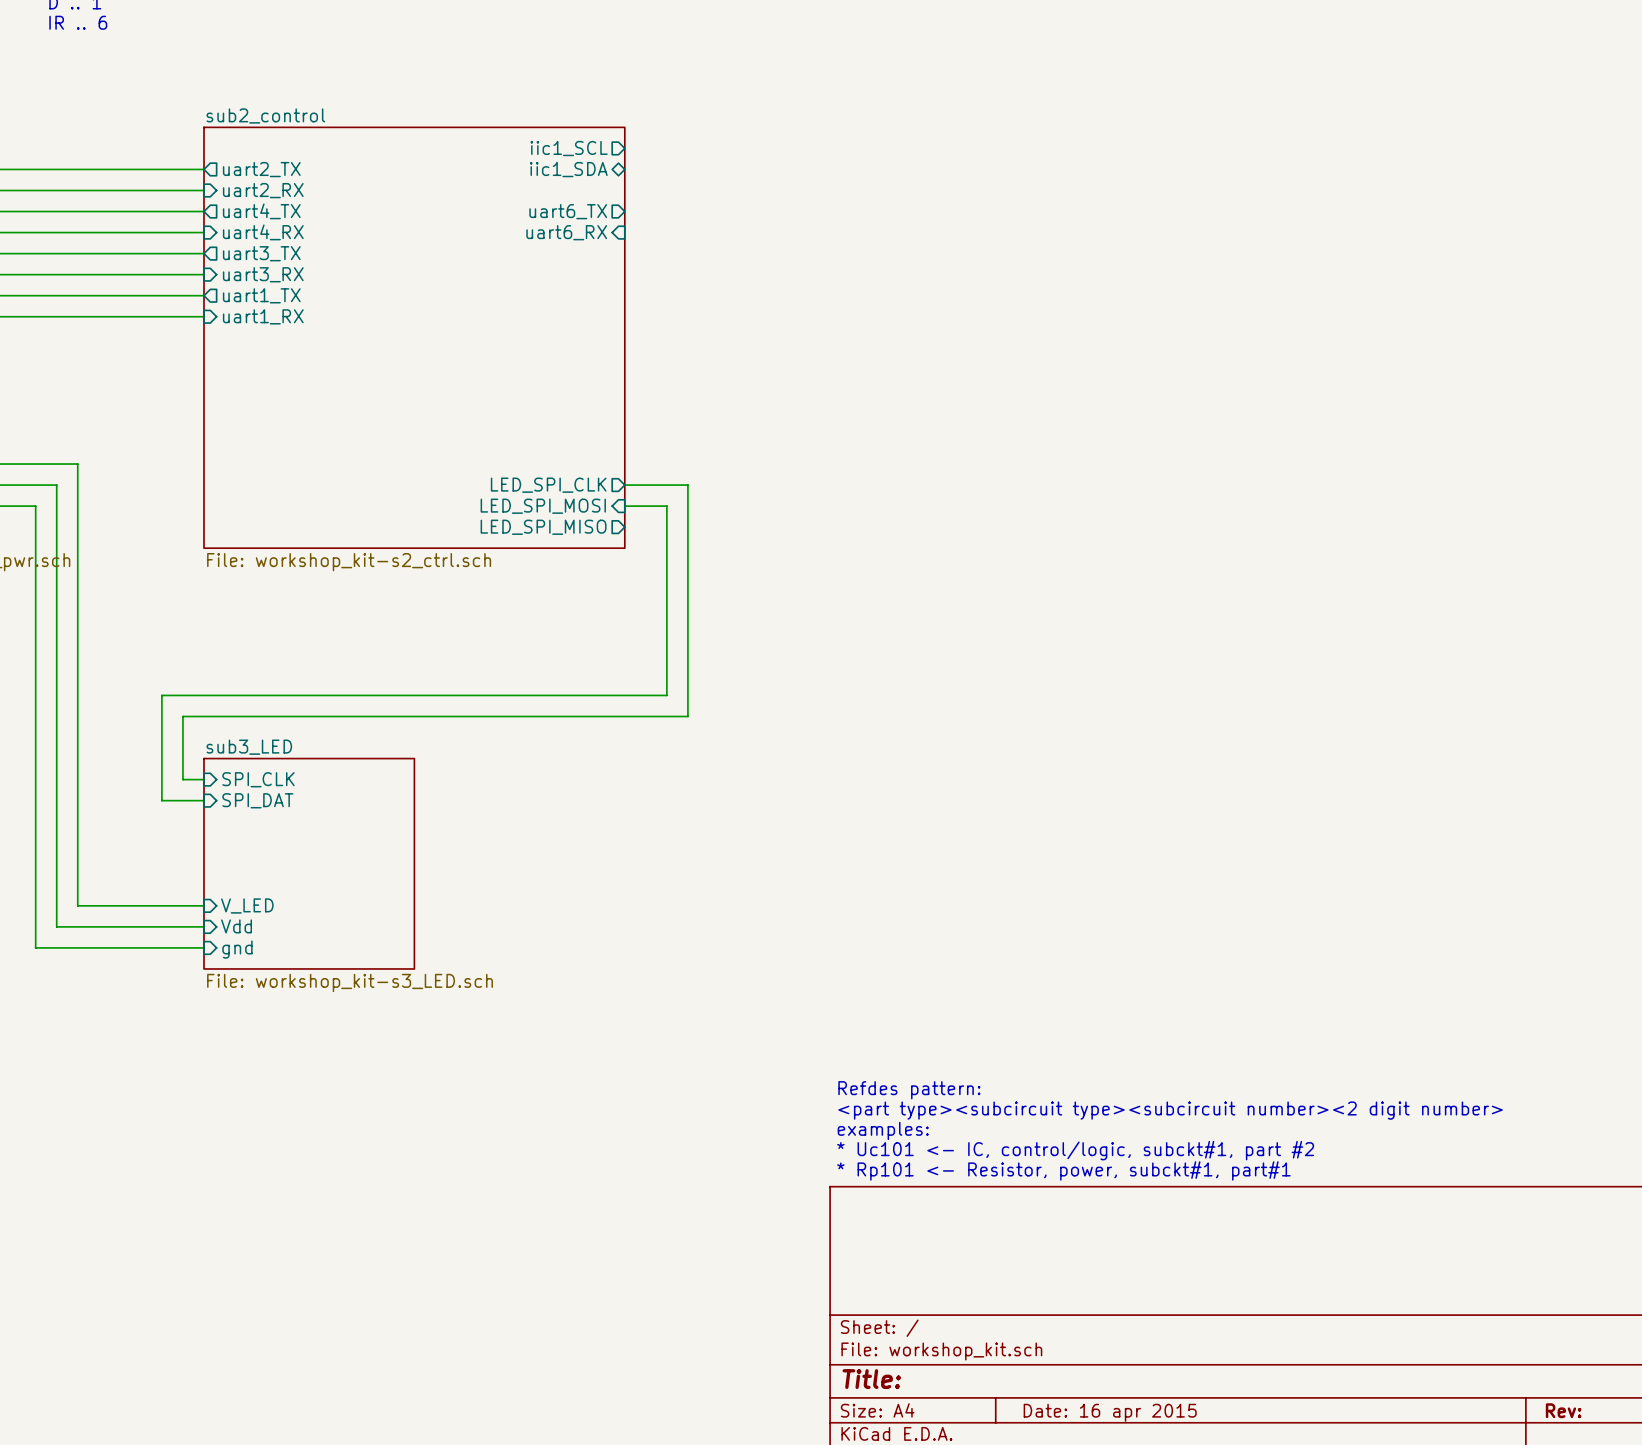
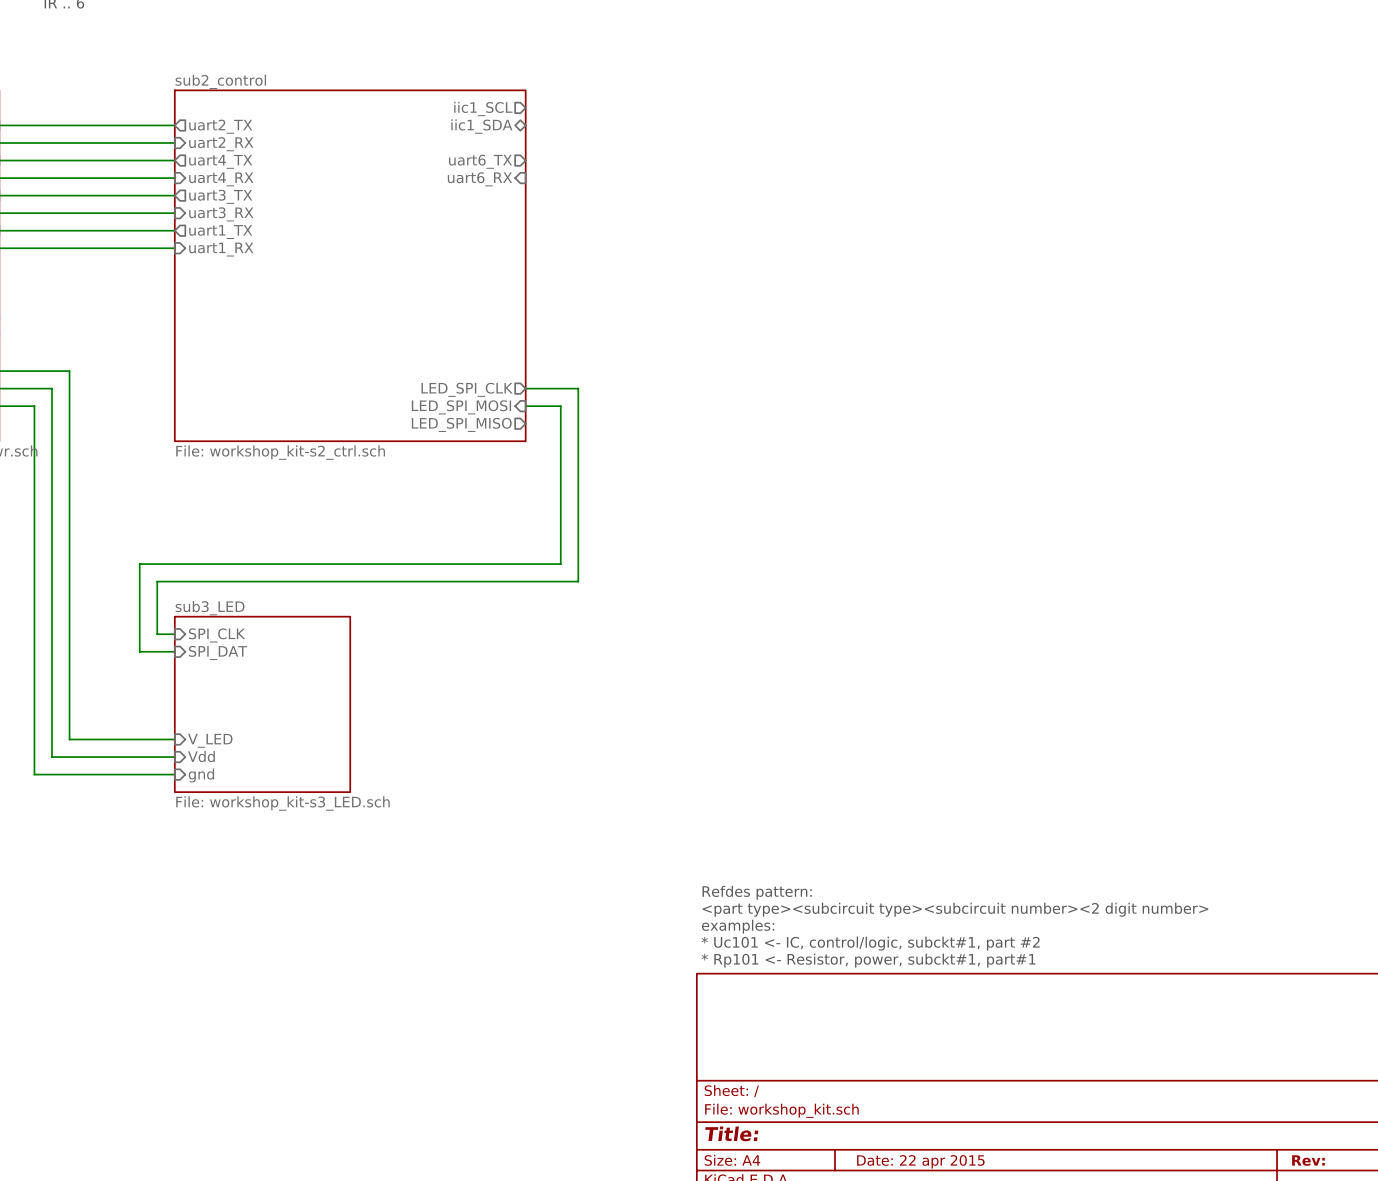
title block: Date: 16 apr 2015 (1110, 1412) -> Date: 22 apr 2015 (920, 1161)

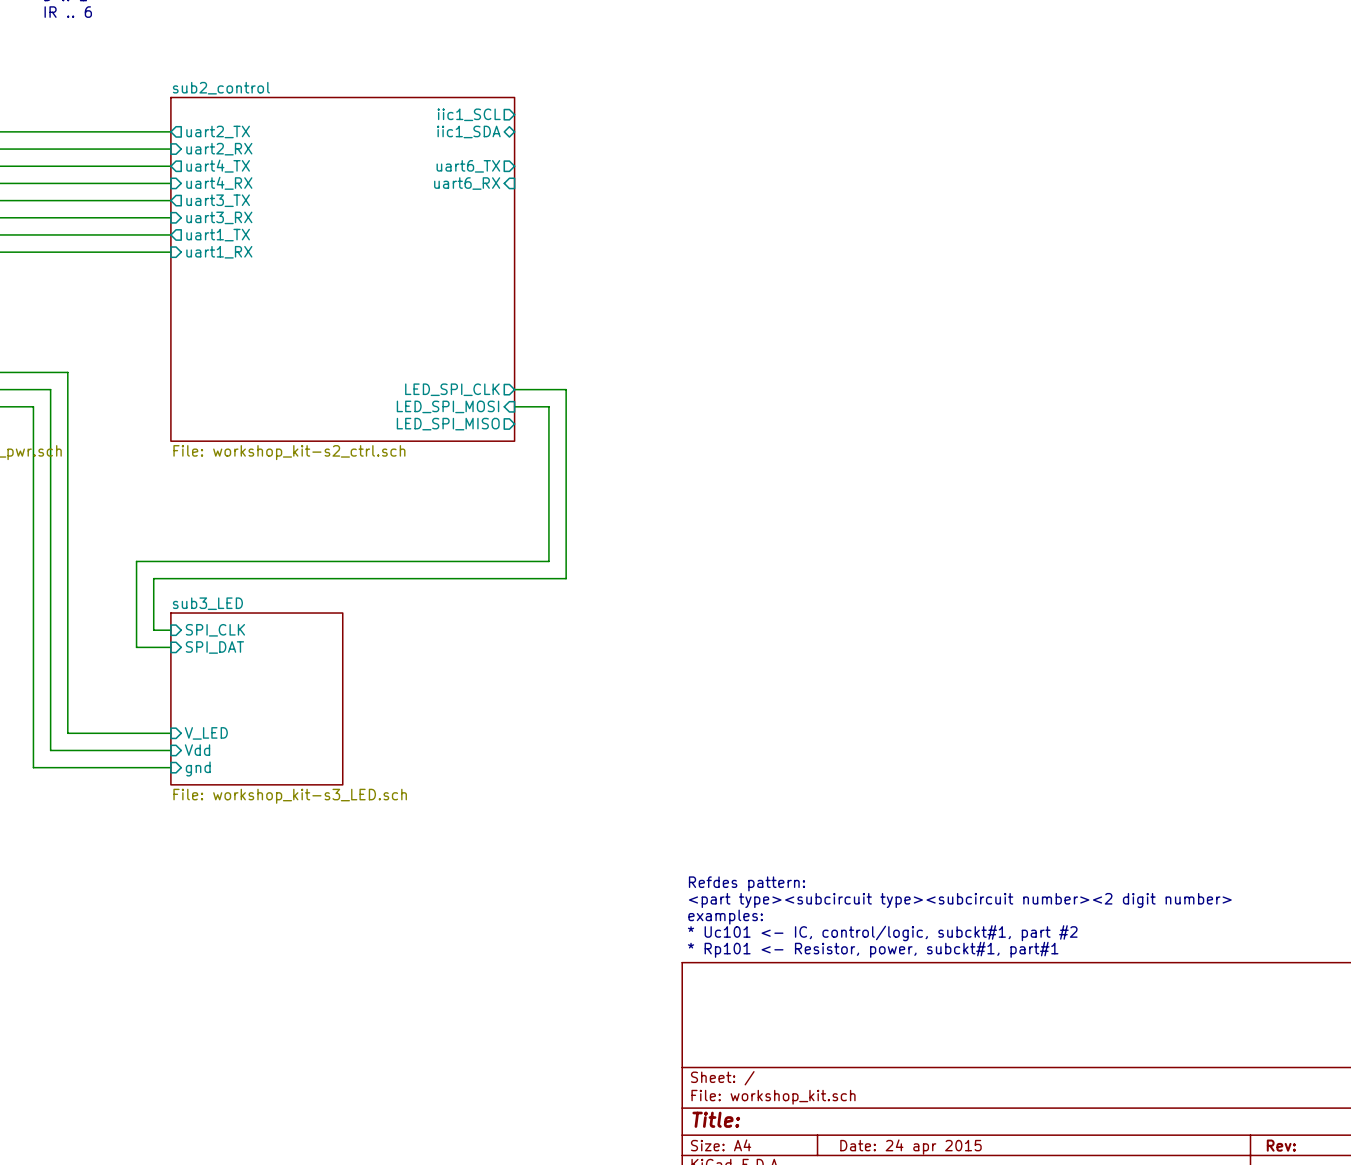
title block: Date: 22 apr 2015 (920, 1161) -> Date: 24 apr 2015 (910, 1147)

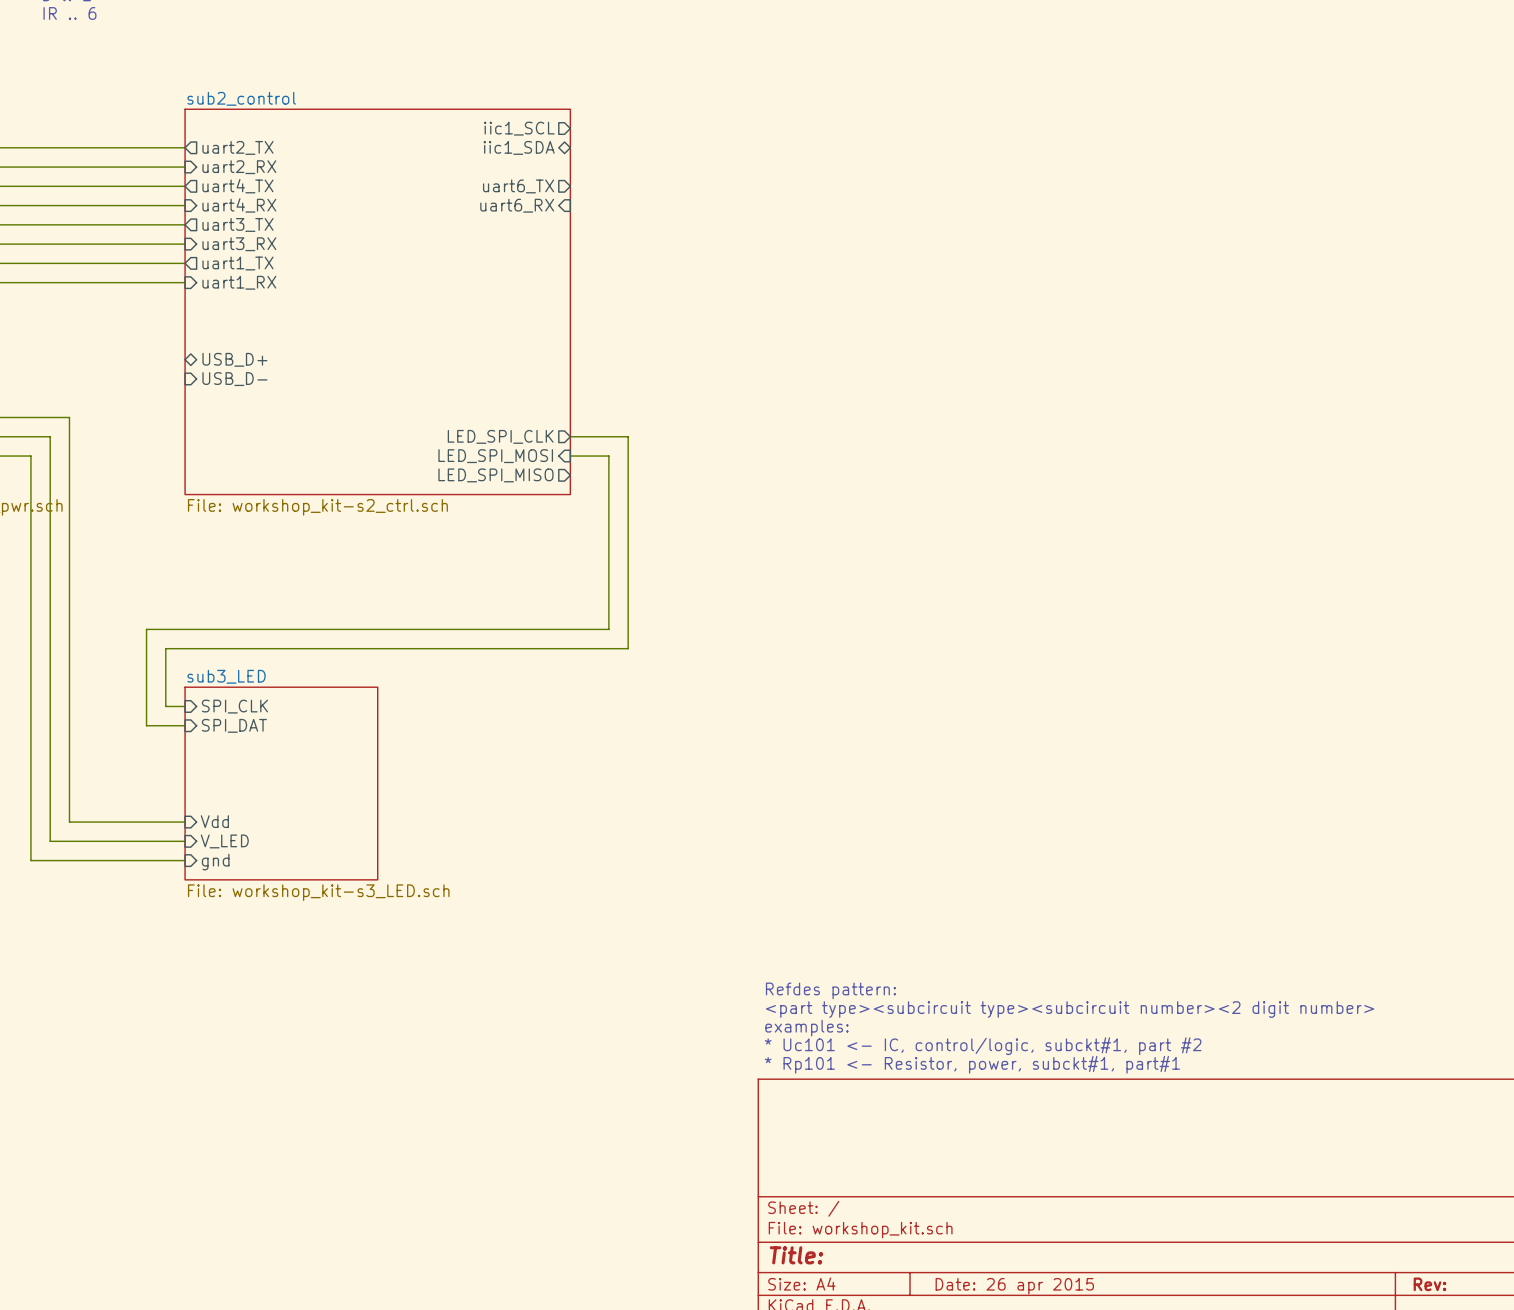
sheet pin: none -> USB_D+ (234, 359)
sheet pin: none -> USB_D- (234, 379)
sheet pin: V_LED (206, 733) -> Vdd (214, 821)
sheet pin: Vdd (197, 750) -> V_LED (224, 841)
title block: Date: 24 apr 2015 (910, 1147) -> Date: 26 apr 2015 (1014, 1286)

